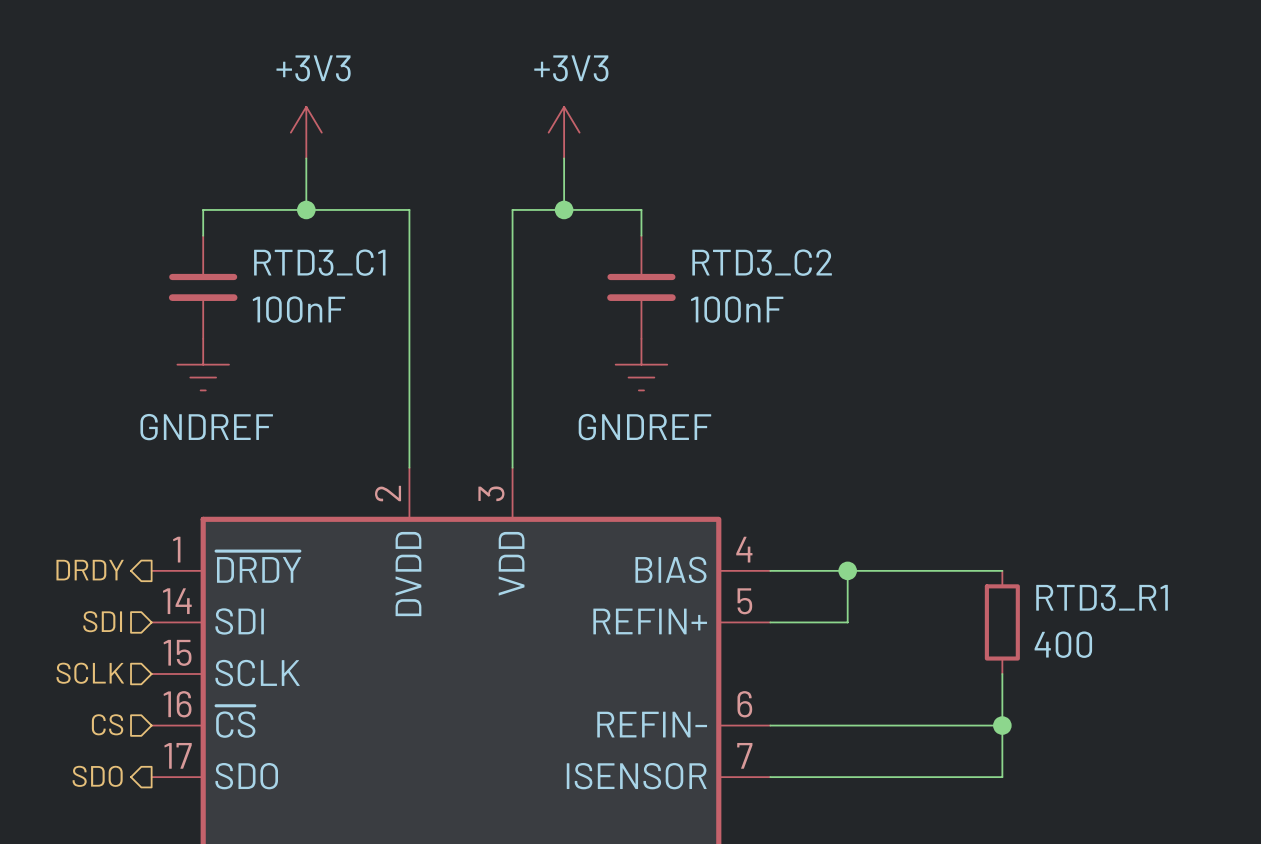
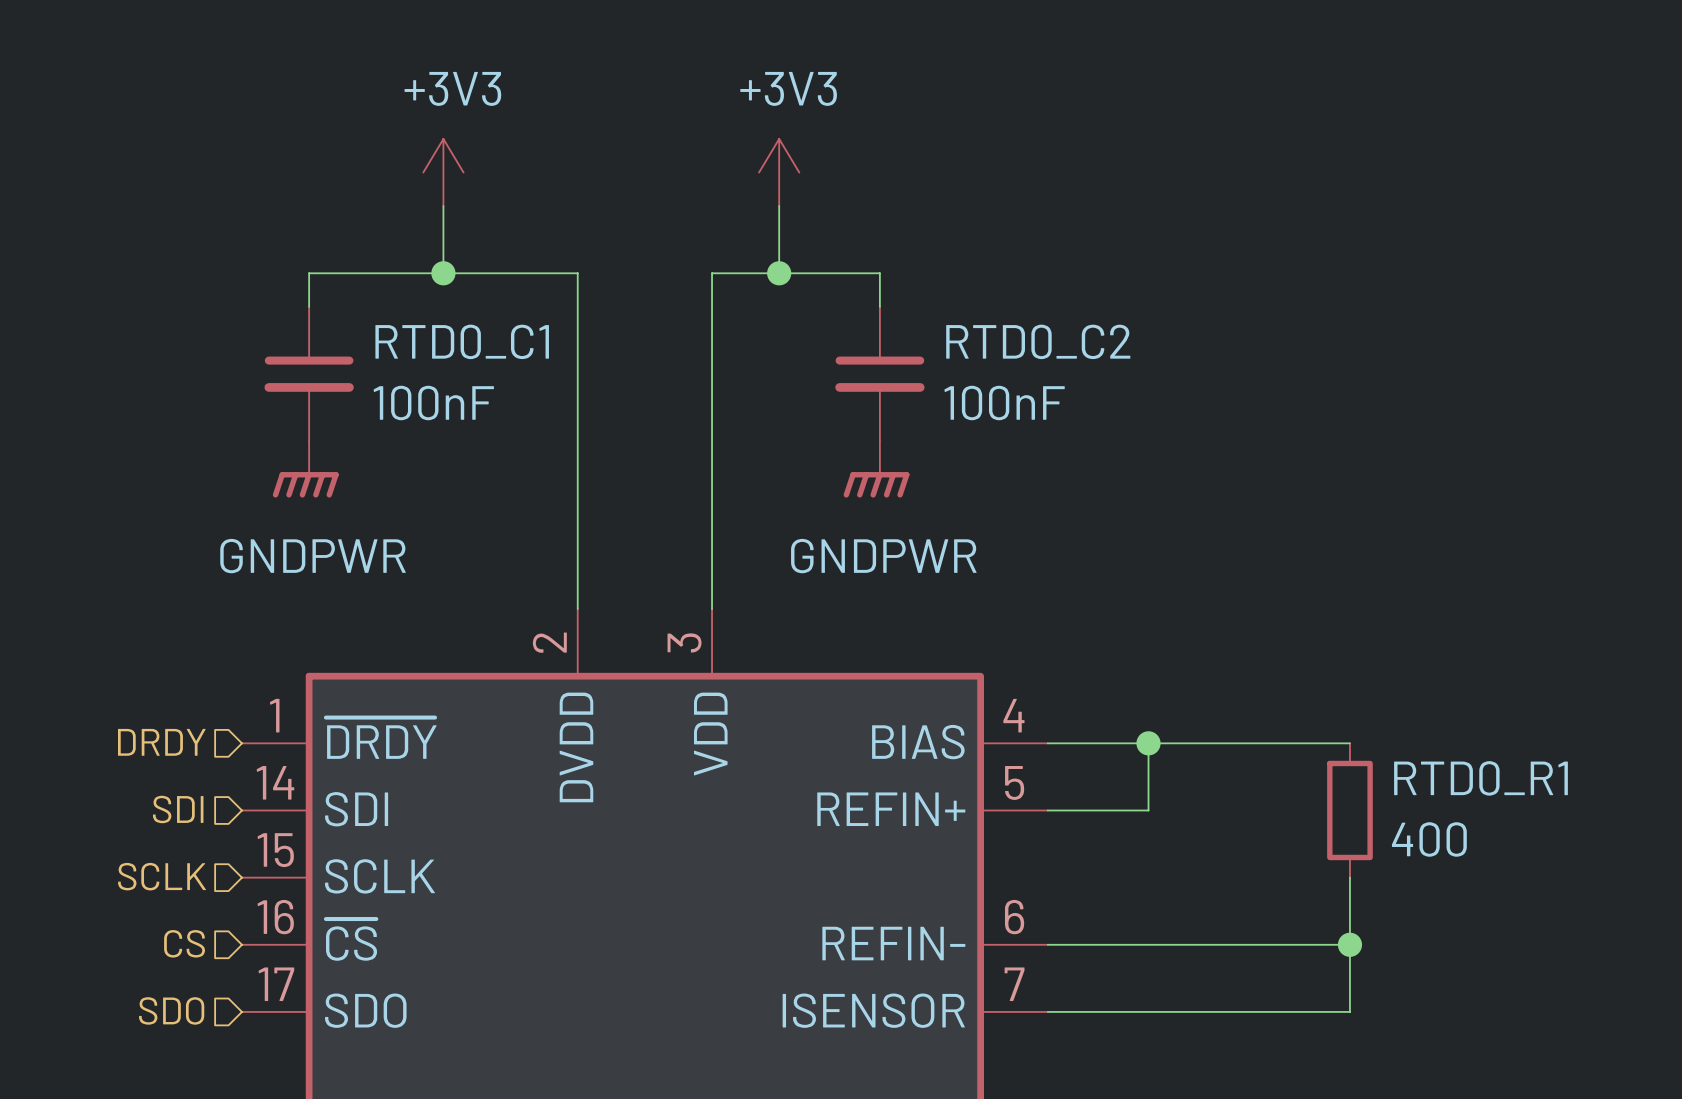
RTD3_C1 name: RTD3_C1 (319, 262) -> RTD0_C1 (462, 341)
RTD3_C2 name: RTD3_C2 (762, 262) -> RTD0_C2 (1038, 341)
power symbol: GNDREF (203, 364) -> GNDPWR (305, 469)
power symbol: GNDREF (641, 364) -> GNDPWR (876, 469)
hierarchical label shape: output (90, 570) -> input (161, 742)
RTD3_R1 name: RTD3_R1 (1102, 597) -> RTD0_R1 (1480, 778)
hierarchical label shape: output (97, 776) -> input (171, 1010)

